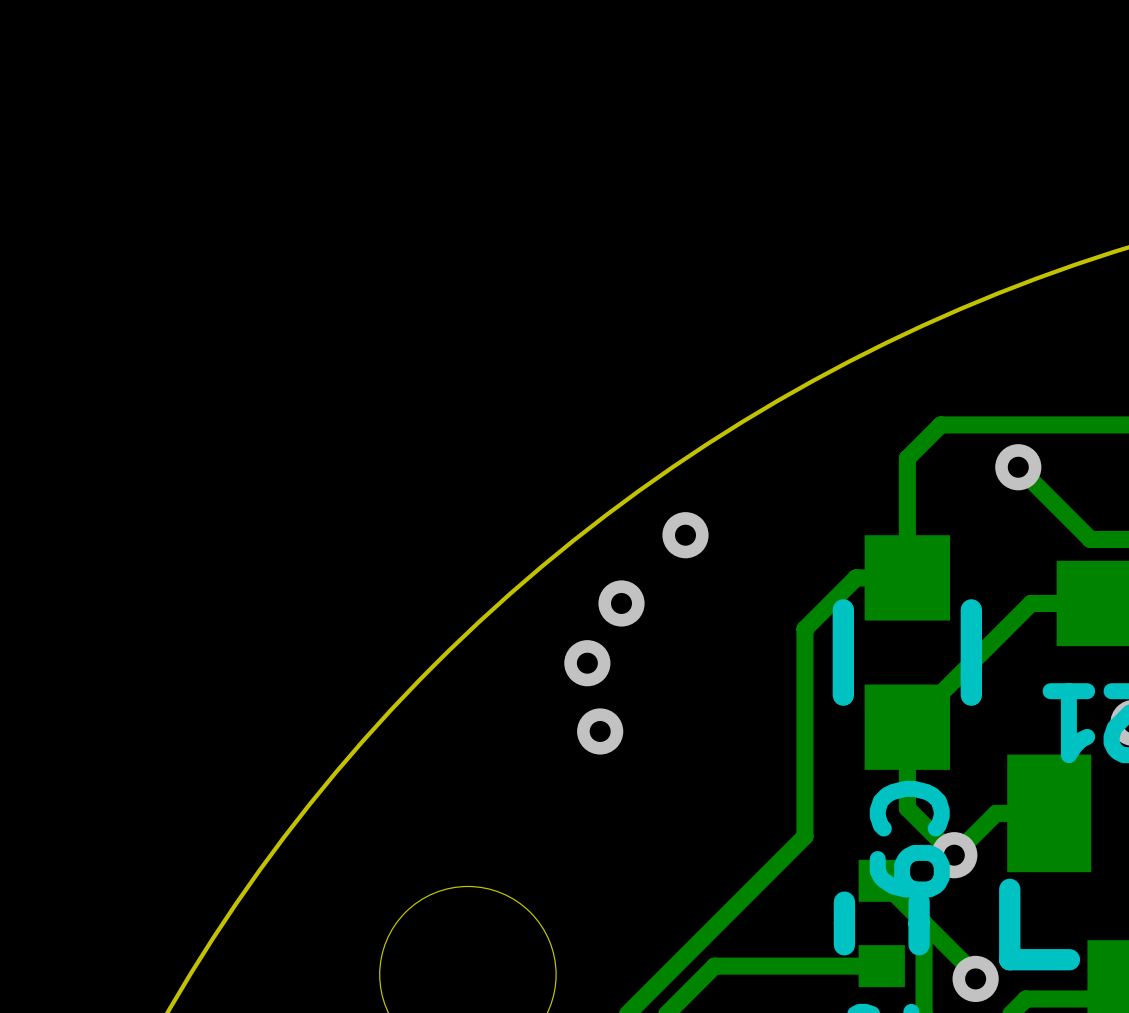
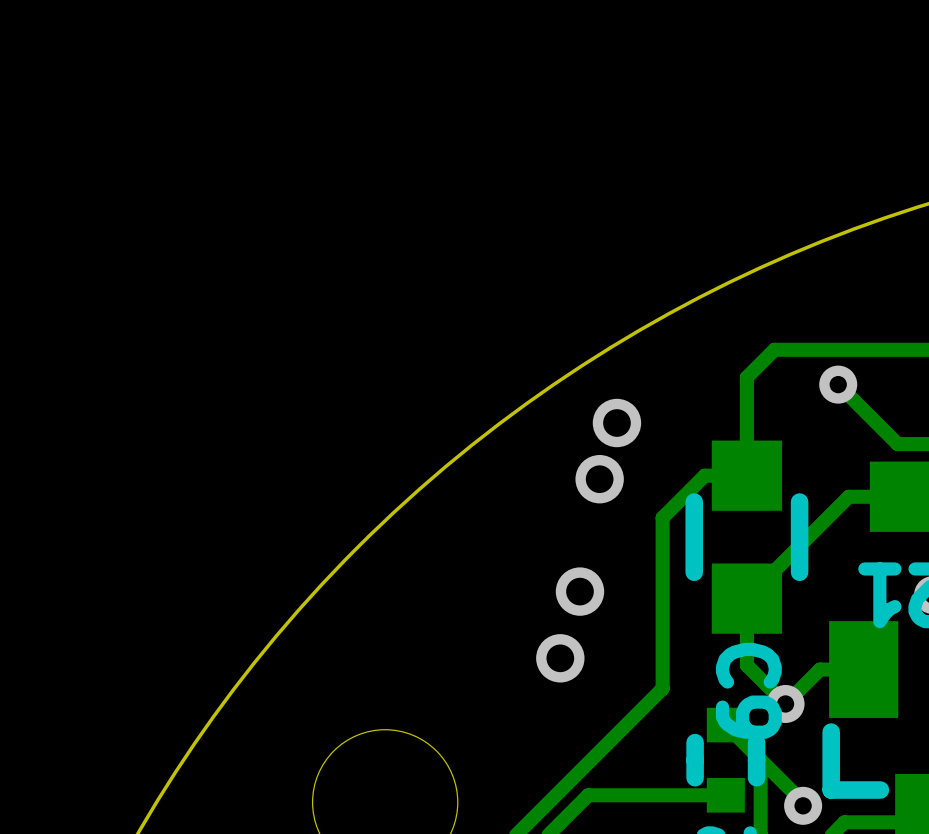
via: none -> (616, 423)
via position: (685, 535) -> (599, 479)
via: (621, 603) -> none
via: (587, 663) -> none
via: none -> (579, 591)
via: (600, 731) -> none
via: none -> (560, 658)

